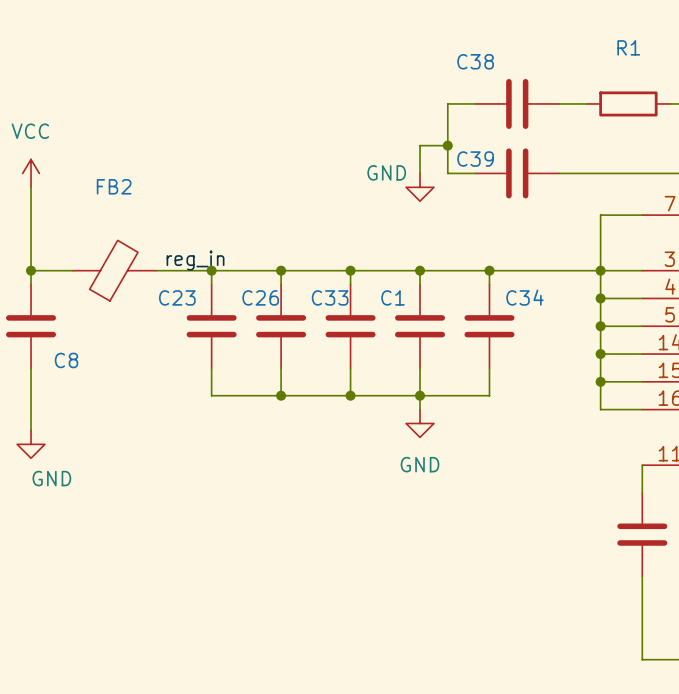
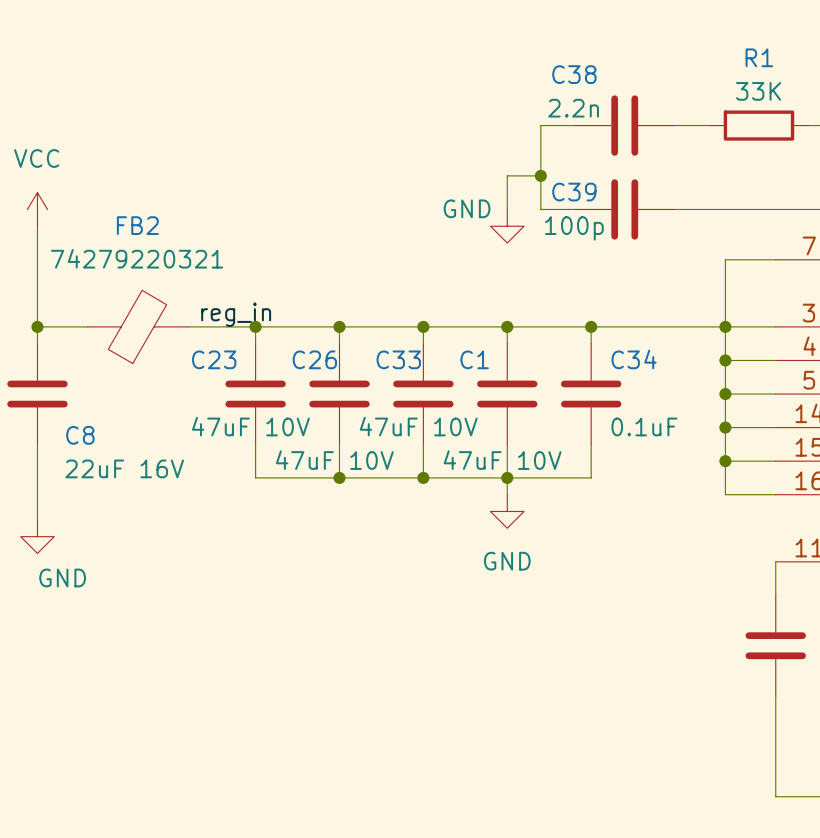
R1 value: none -> 33K (758, 91)
C38 value: none -> 2.2n (573, 108)
C39 value: none -> 100p (574, 228)
FB2 value: none -> 74279220321 (137, 258)
C23 value: none -> 47uF 10V (250, 426)
C33 value: none -> 47uF 10V (418, 426)
C34 value: none -> 0.1uF (644, 426)
C26 value: none -> 47uF 10V (334, 460)
C1 value: none -> 47uF 10V (502, 460)
C8 value: none -> 22uF 16V (124, 468)

